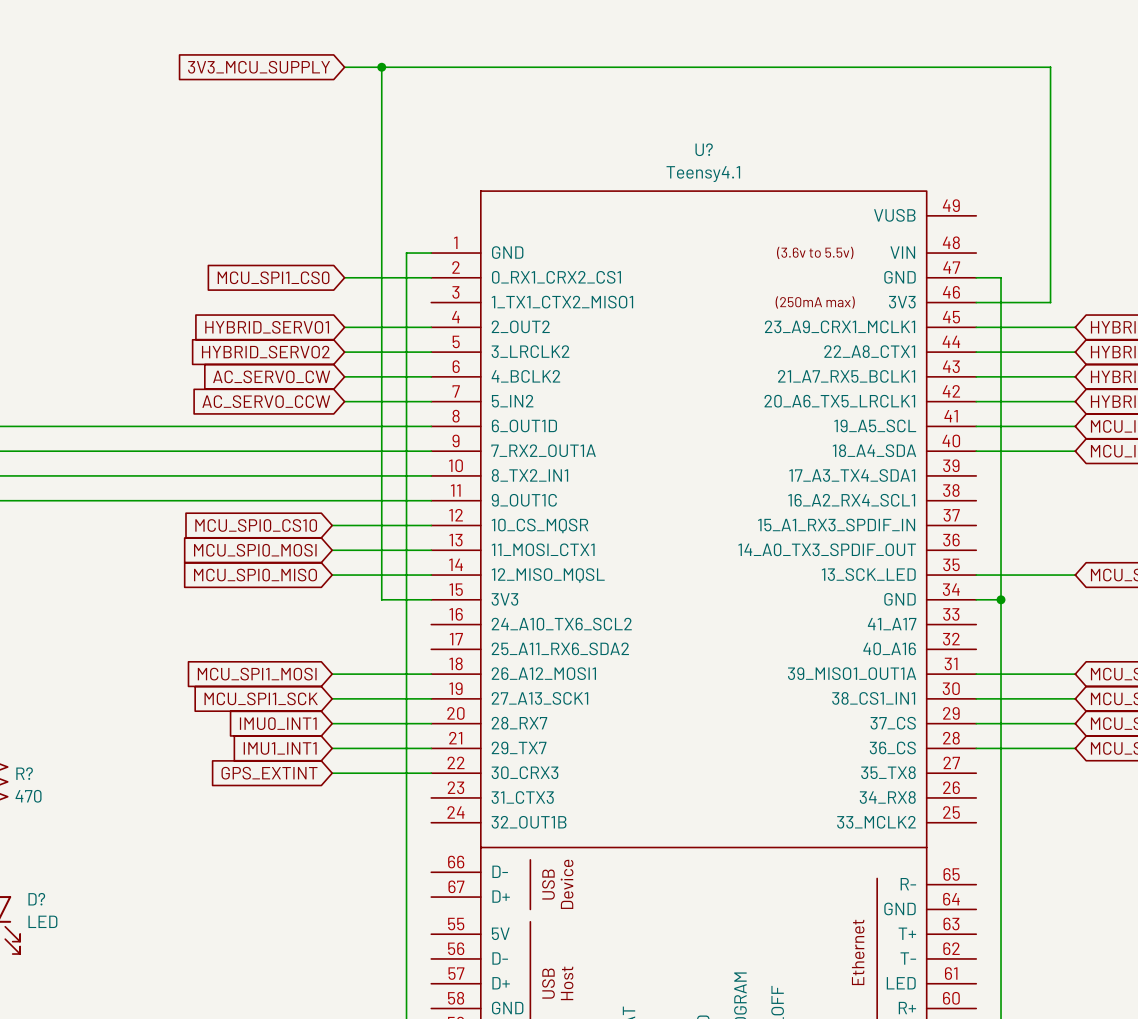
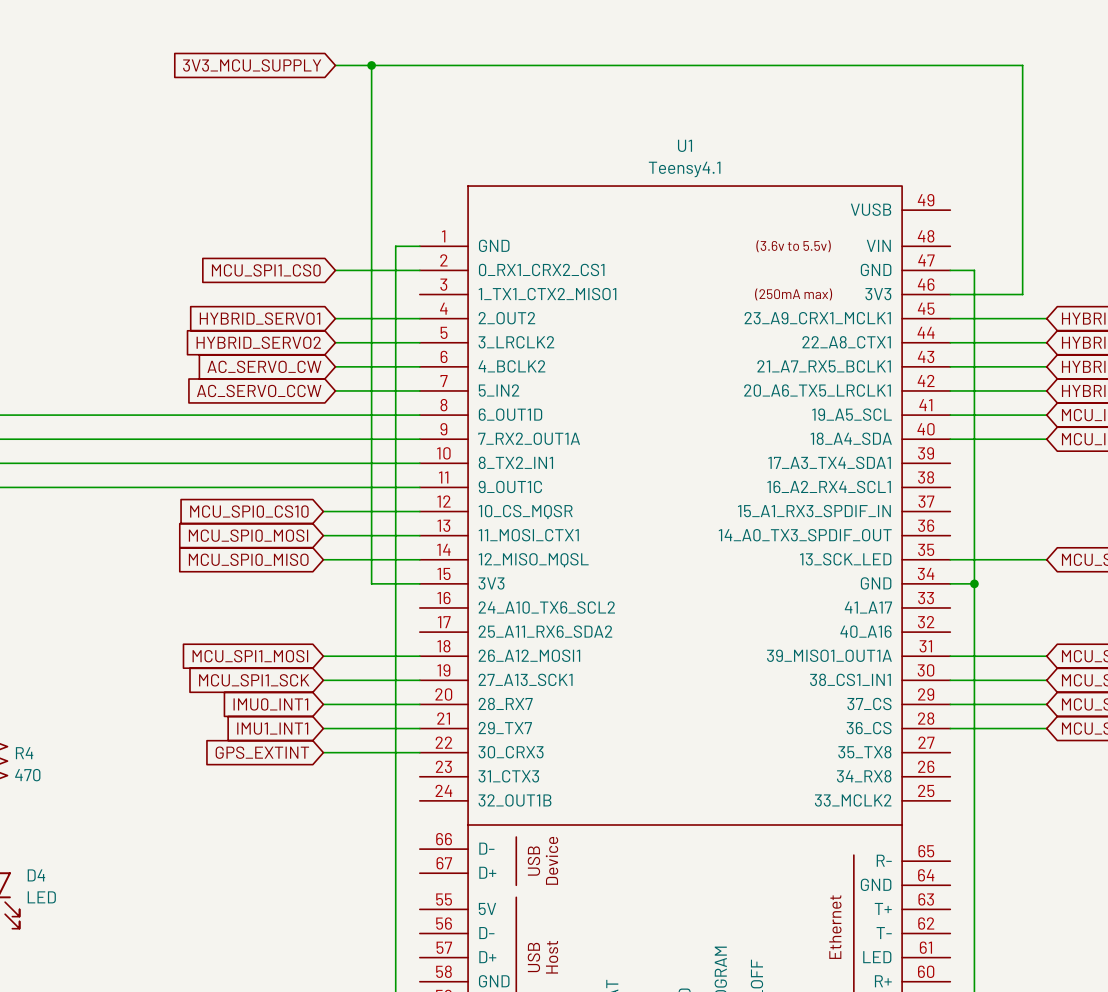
U? name: U? (704, 149) -> U1 (685, 145)
R? name: R? (24, 773) -> R4 (24, 753)
D? name: D? (36, 899) -> D4 (36, 875)

